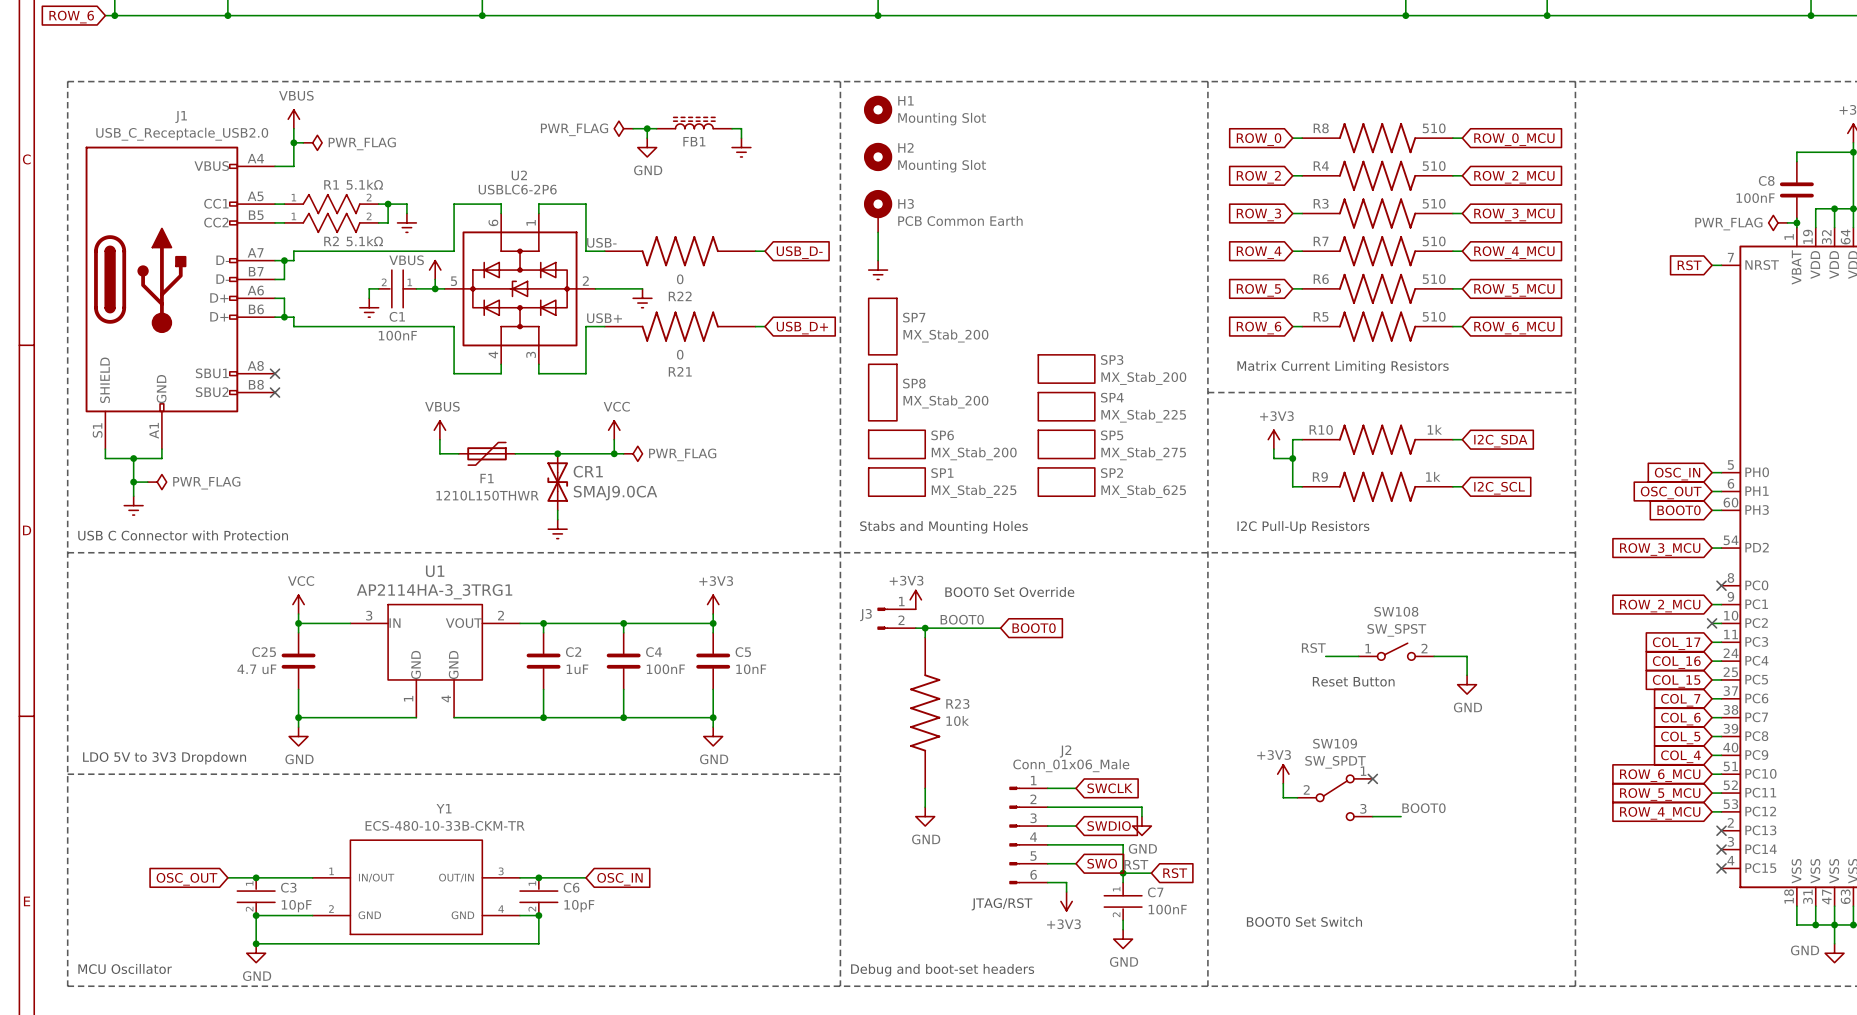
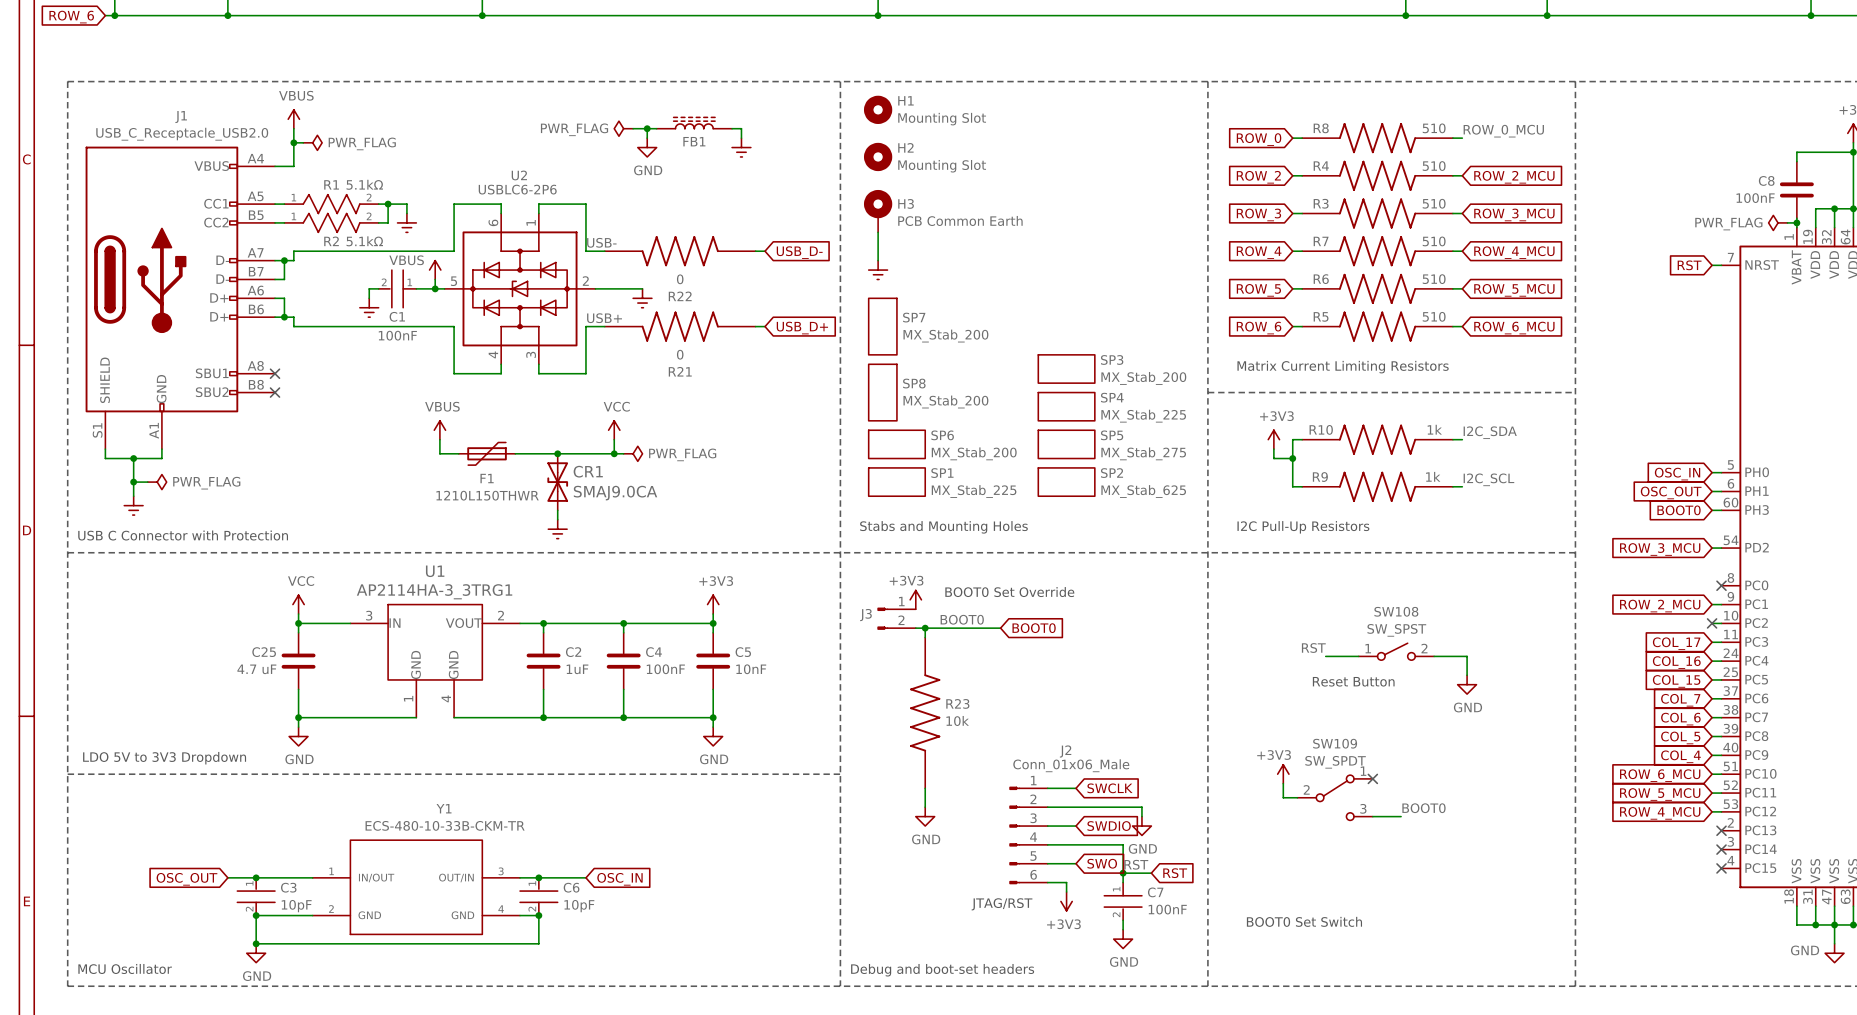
label: none -> ROW_0_MCU (1503, 131)
global label: ROW_0_MCU (1514, 139) -> none
label: none -> I2C_SDA (1490, 432)
global label: I2C_SDA (1500, 441) -> none
label: none -> I2C_SCL (1488, 479)
global label: I2C_SCL (1499, 488) -> none

